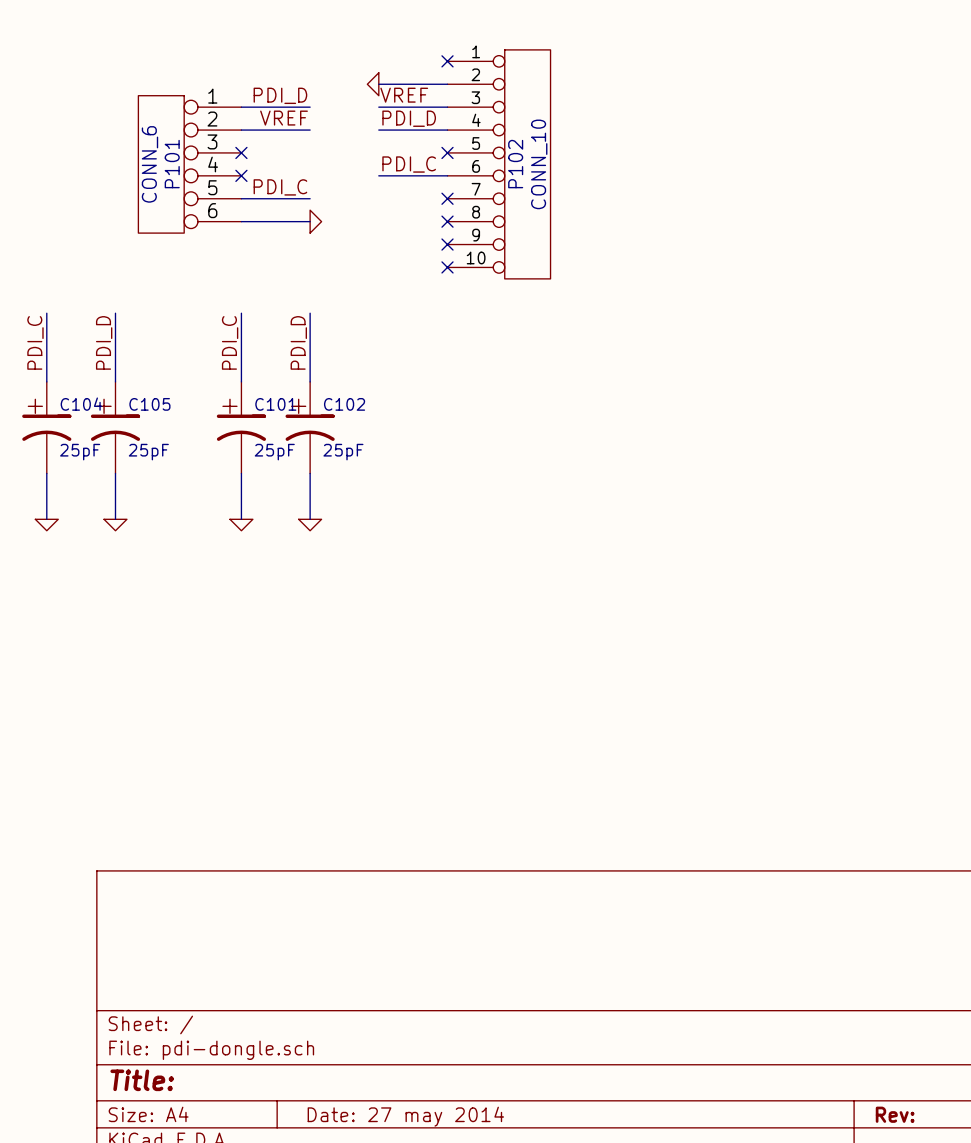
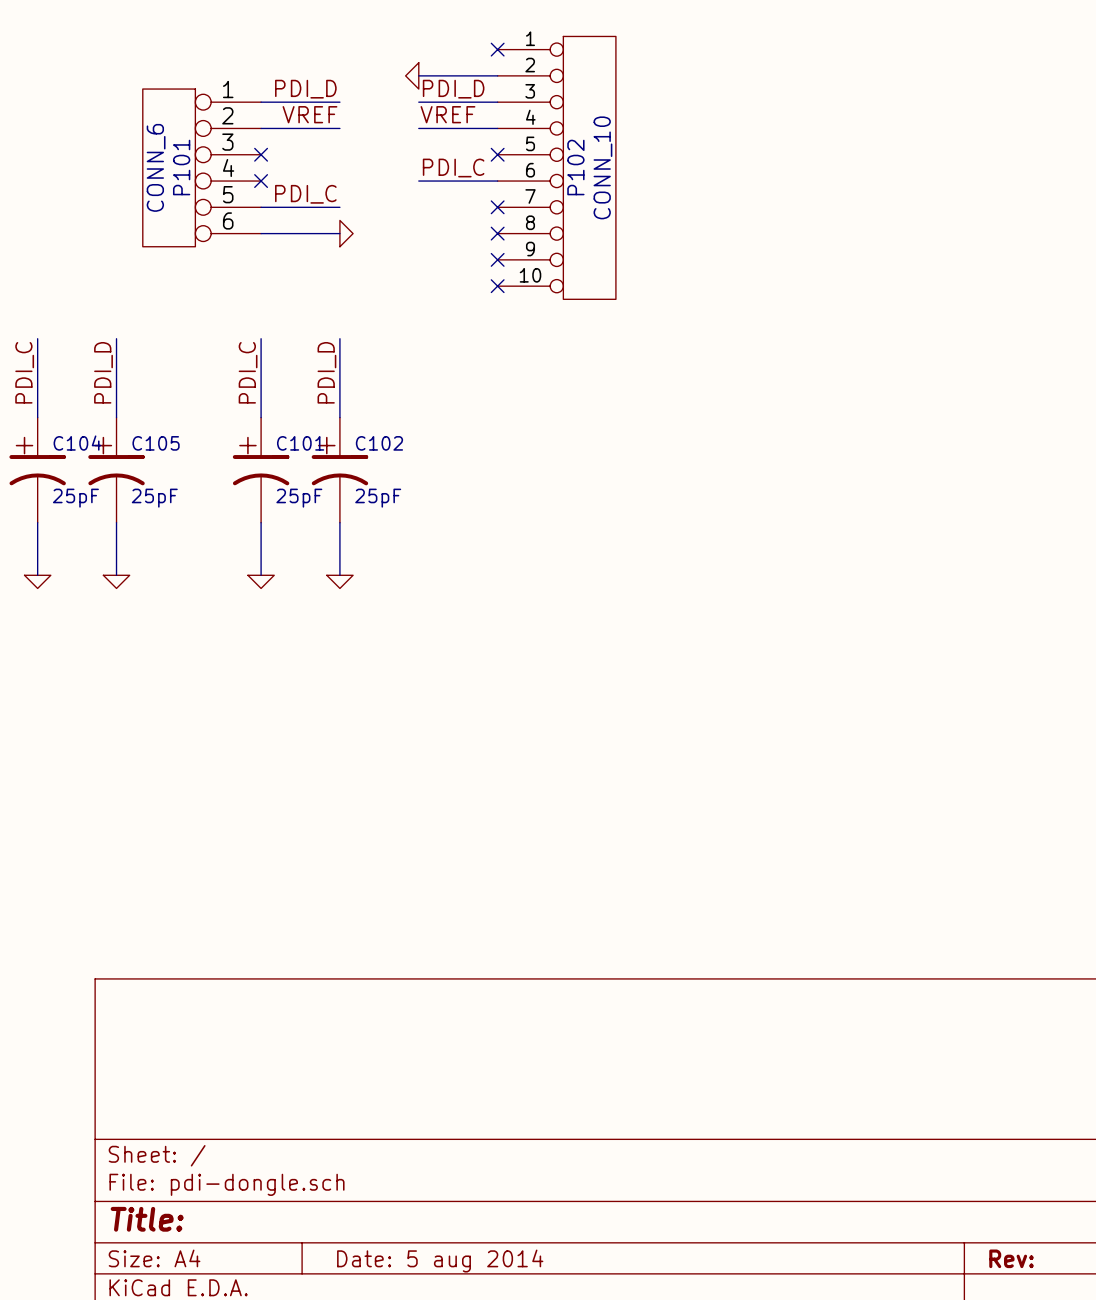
label: VREF (404, 95) -> PDI_D (453, 89)
label: PDI_D (409, 118) -> VREF (447, 114)
title block: Date: 27 may 2014 (405, 1116) -> Date: 5 aug 2014 (440, 1261)

